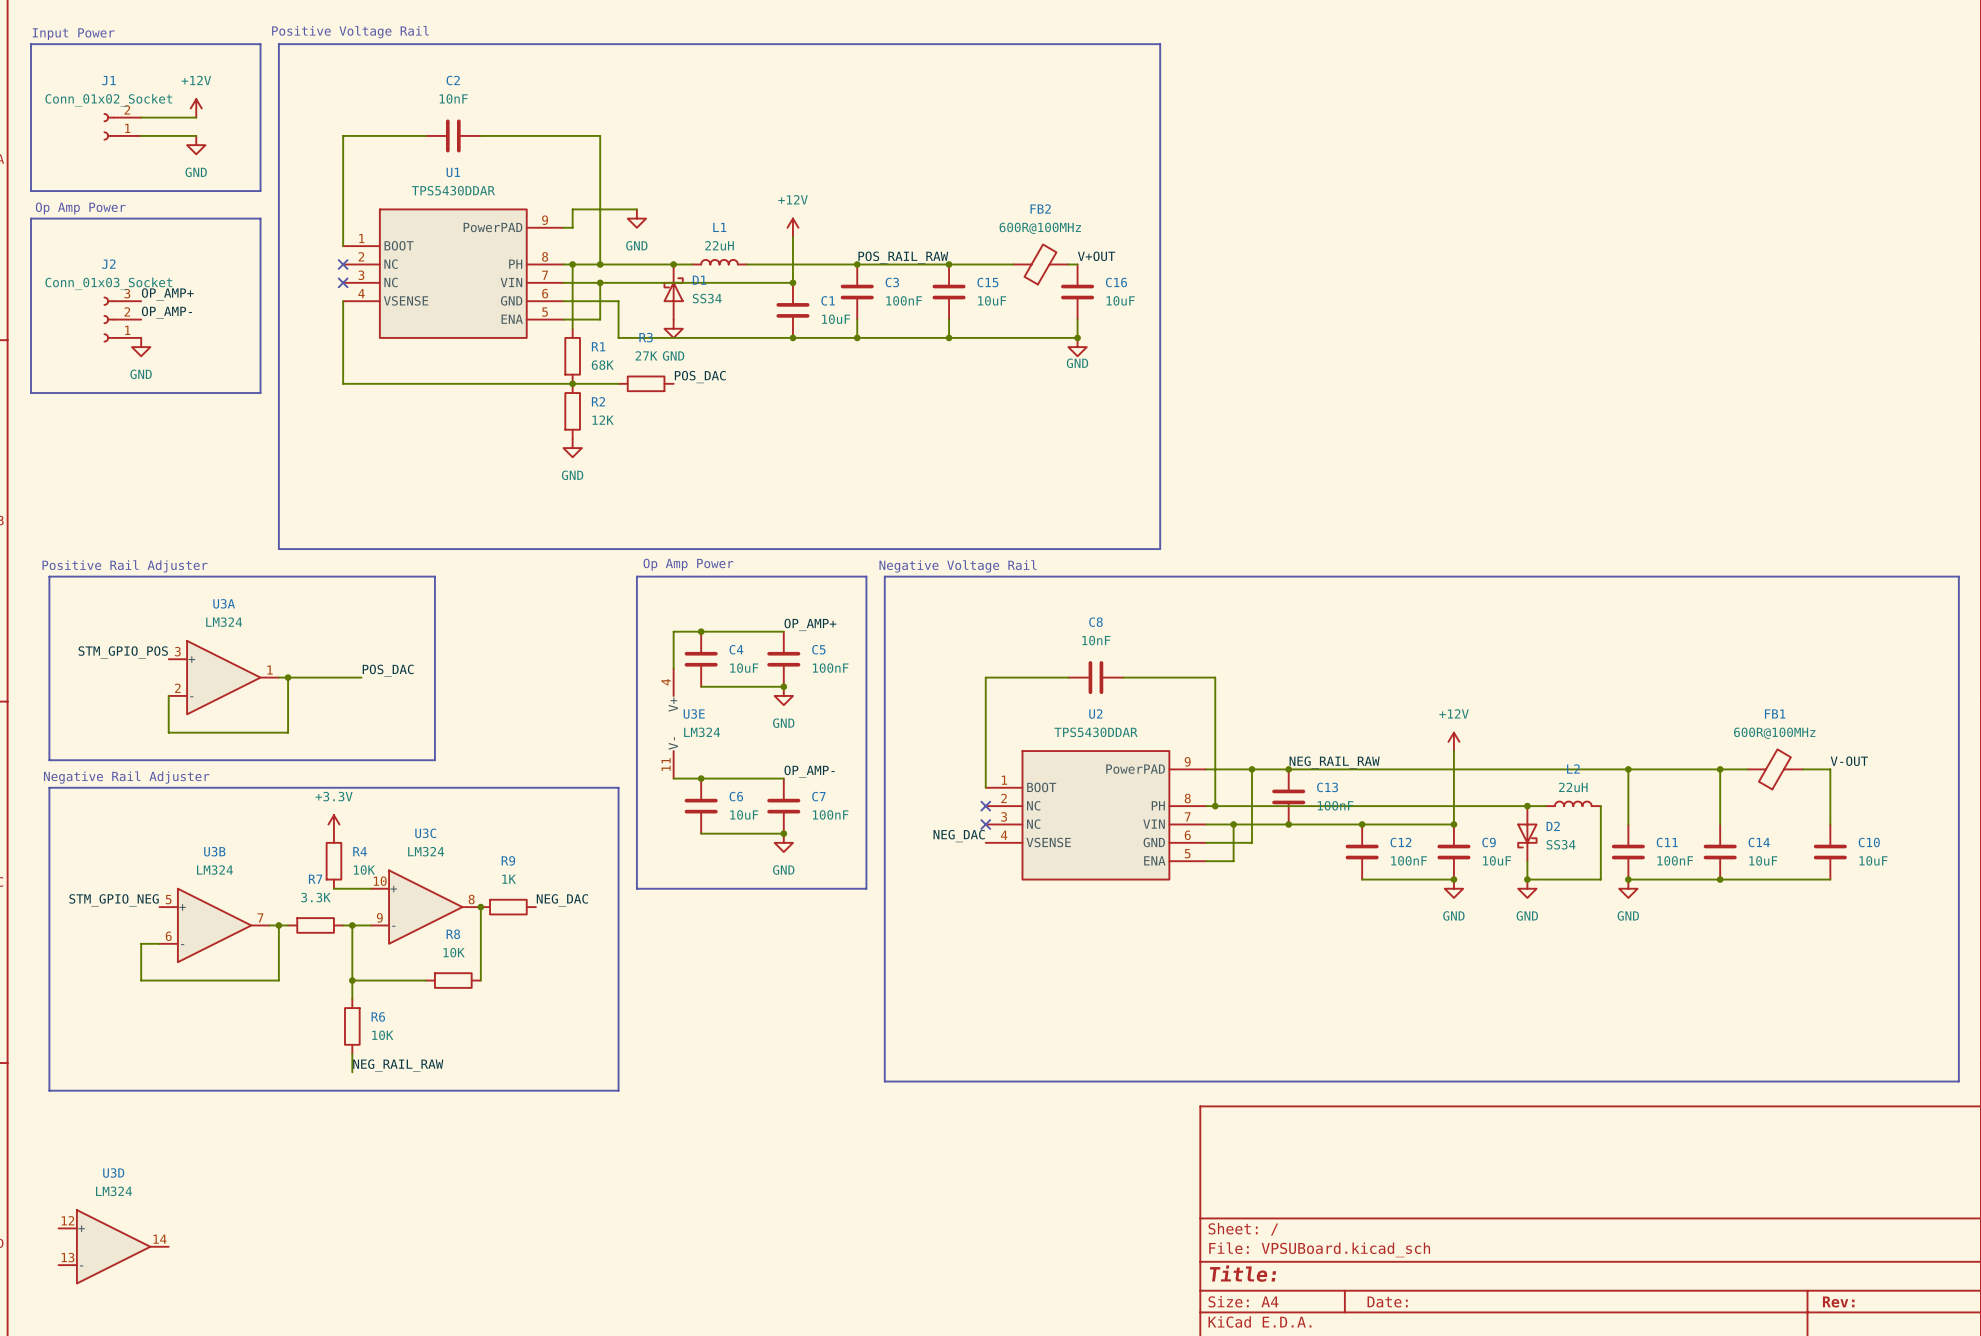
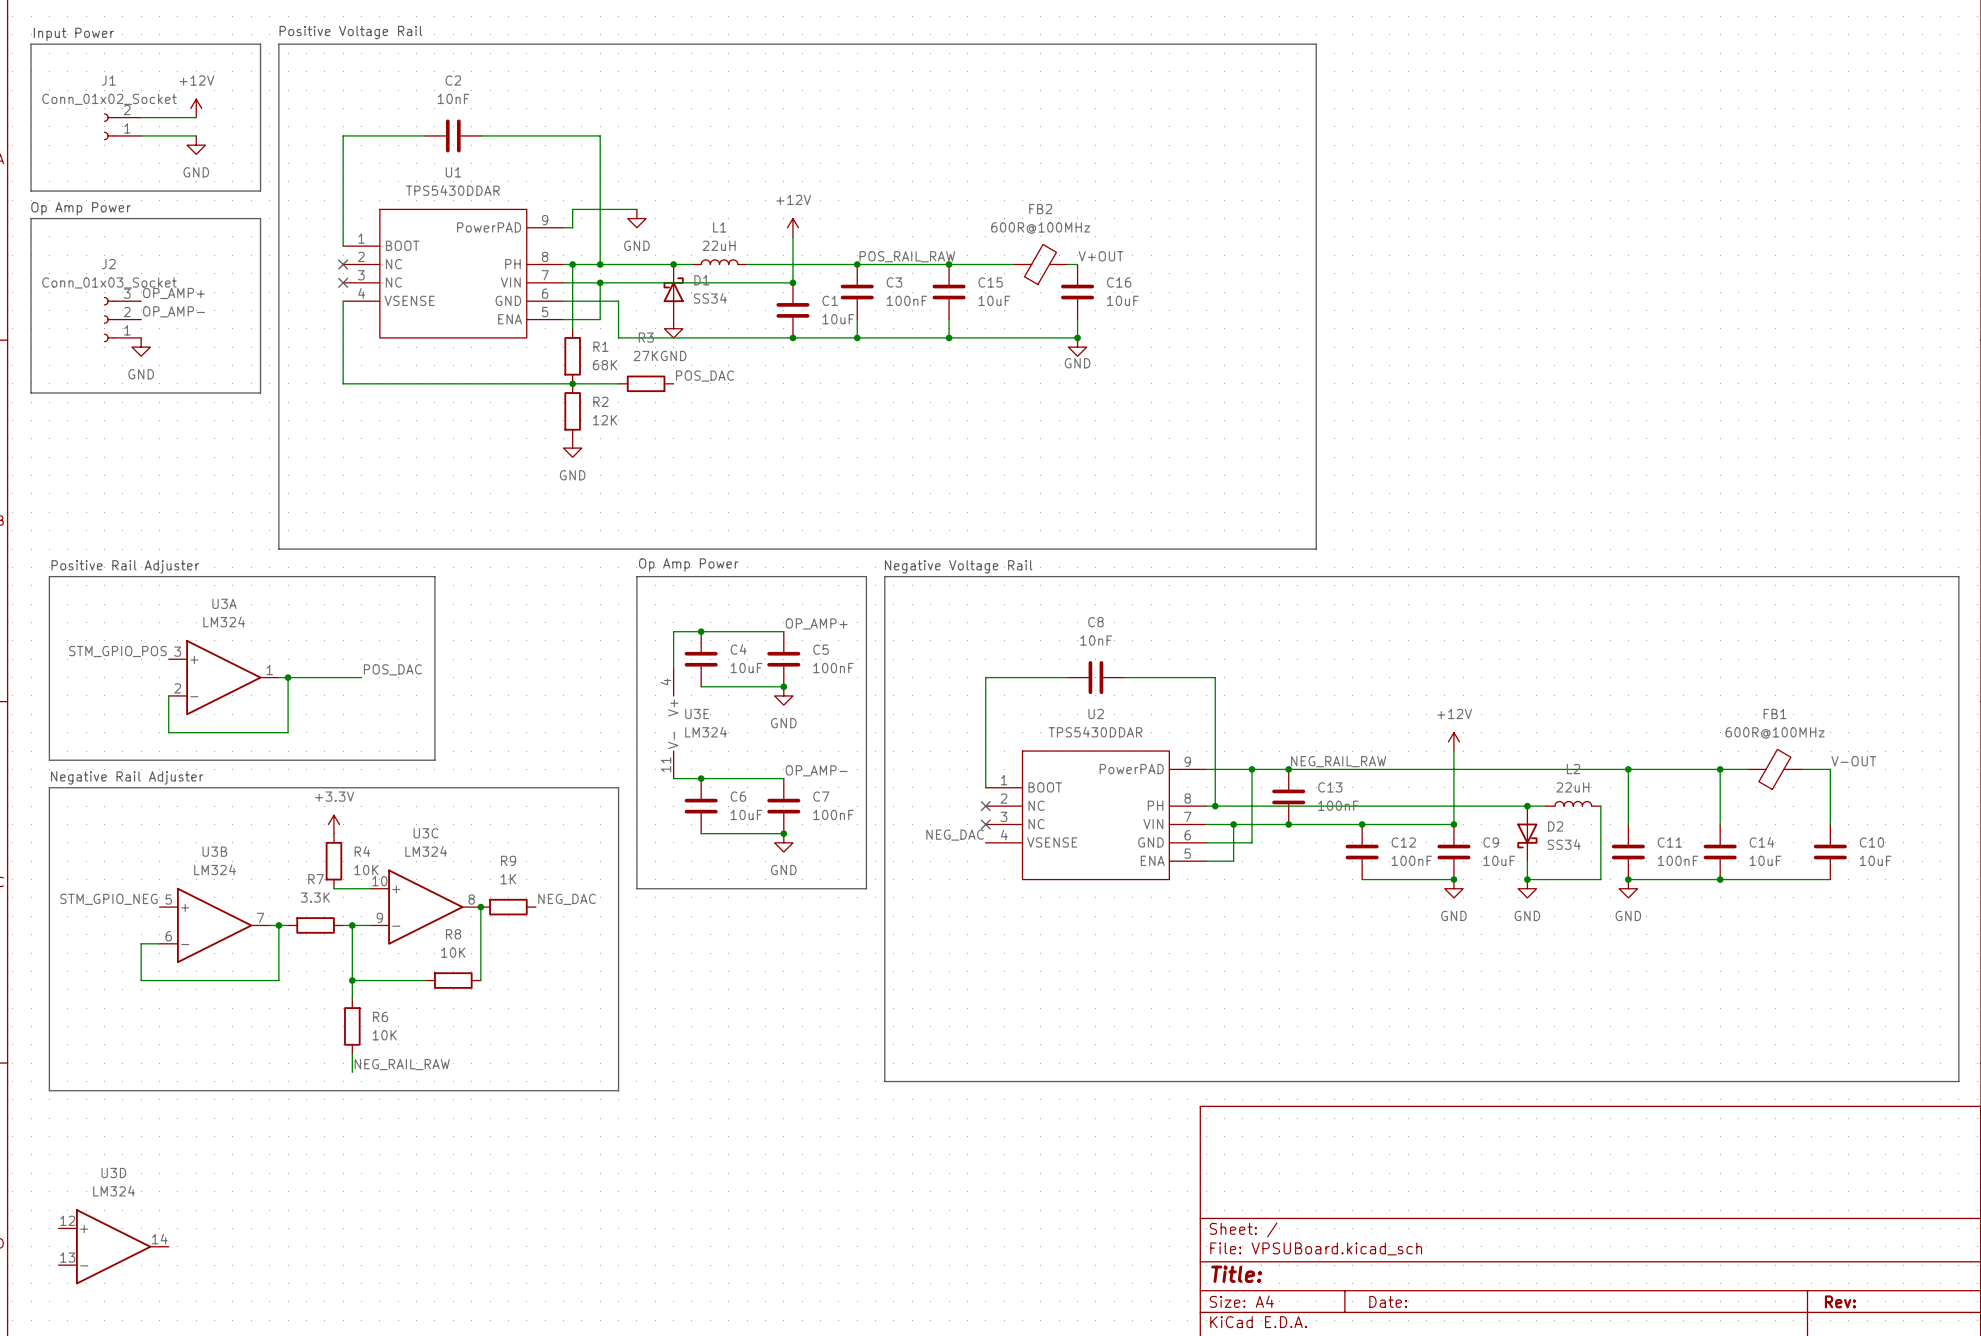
line: (1160, 44) (1160, 549) -> (1160, 44) (1316, 44) (1316, 549) (1160, 549)

